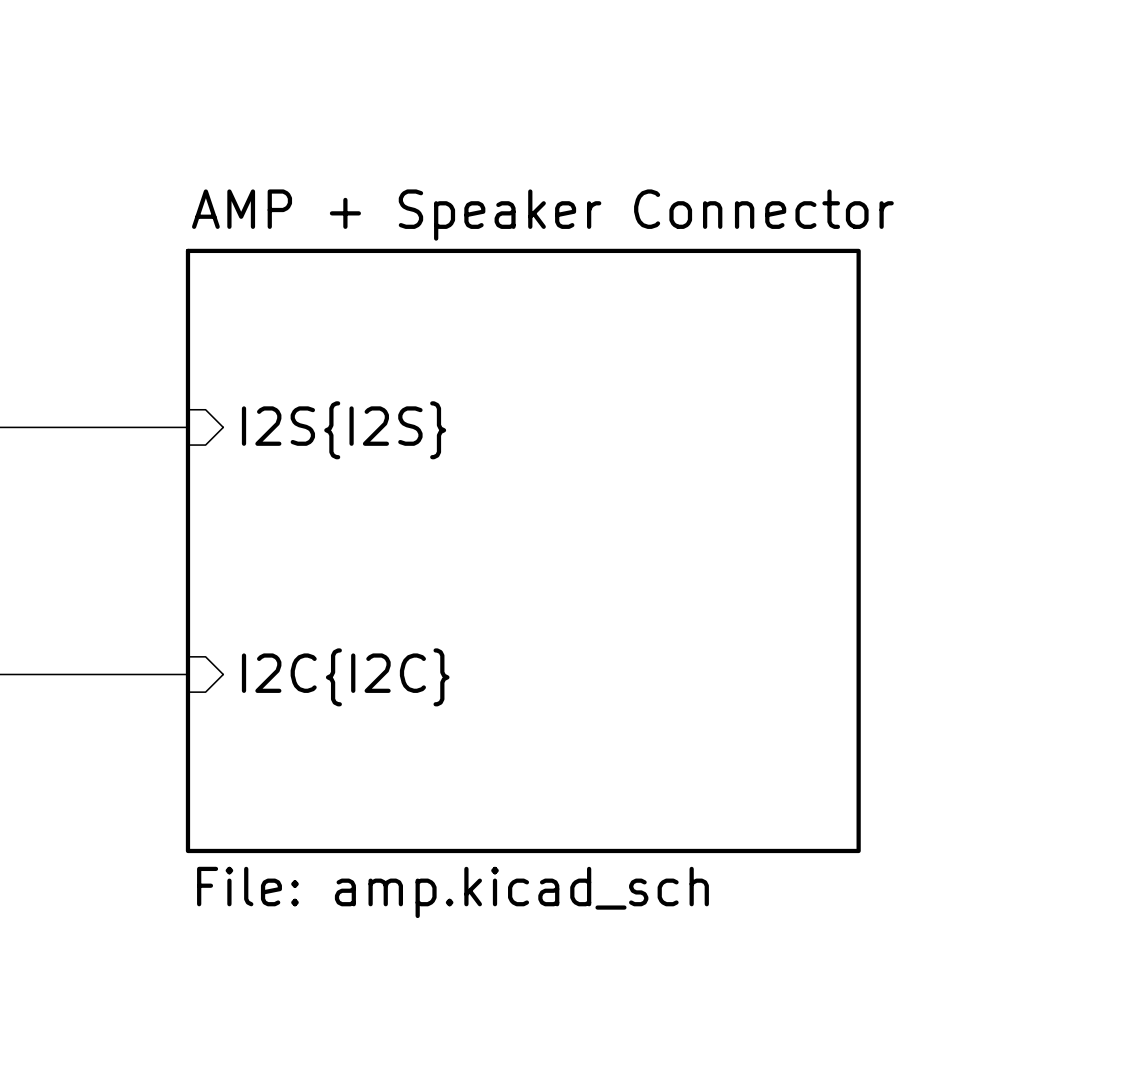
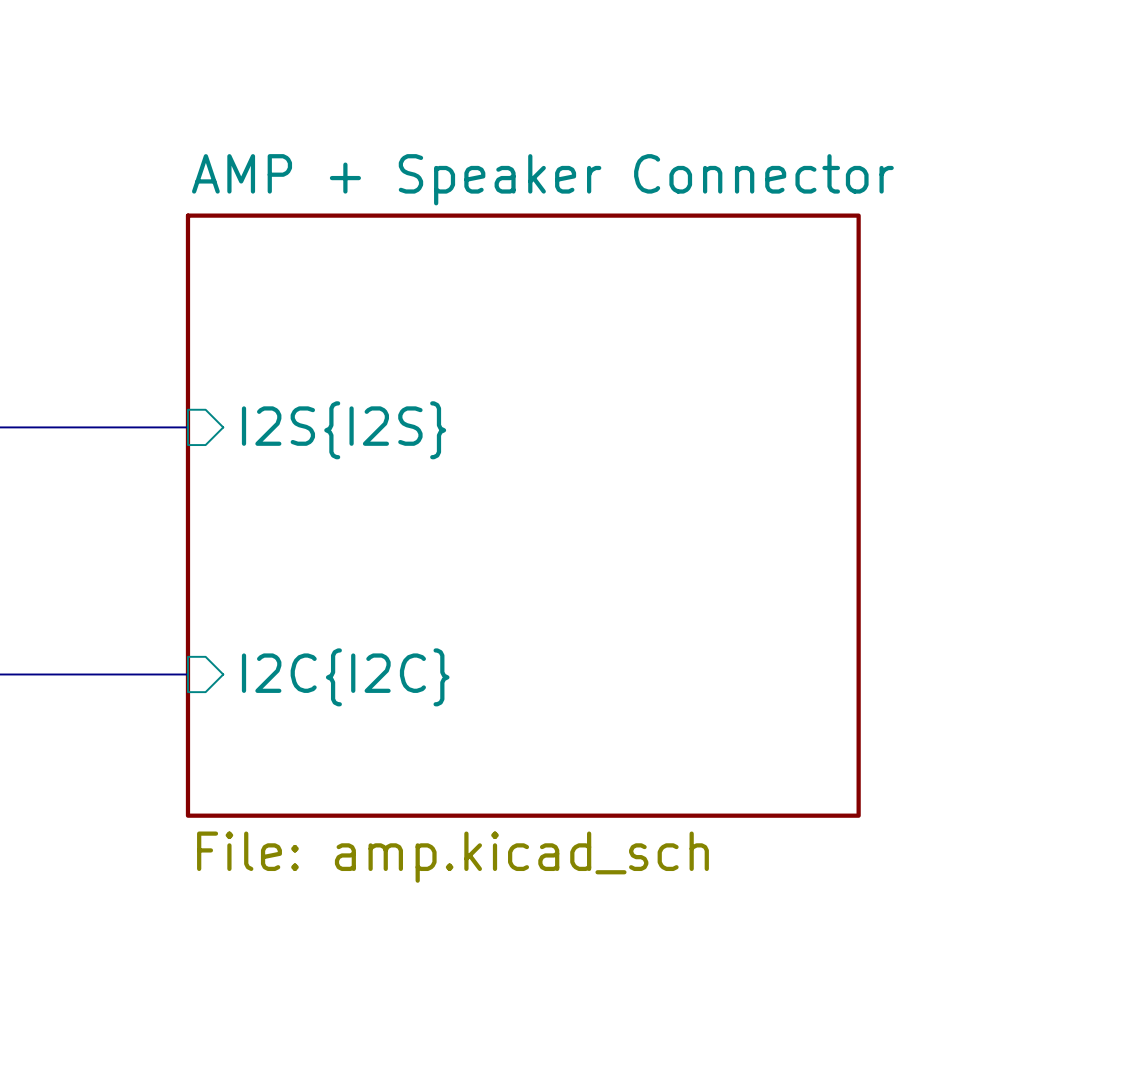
sheet AMP + Speaker Connector position: (523, 550) -> (523, 515)

